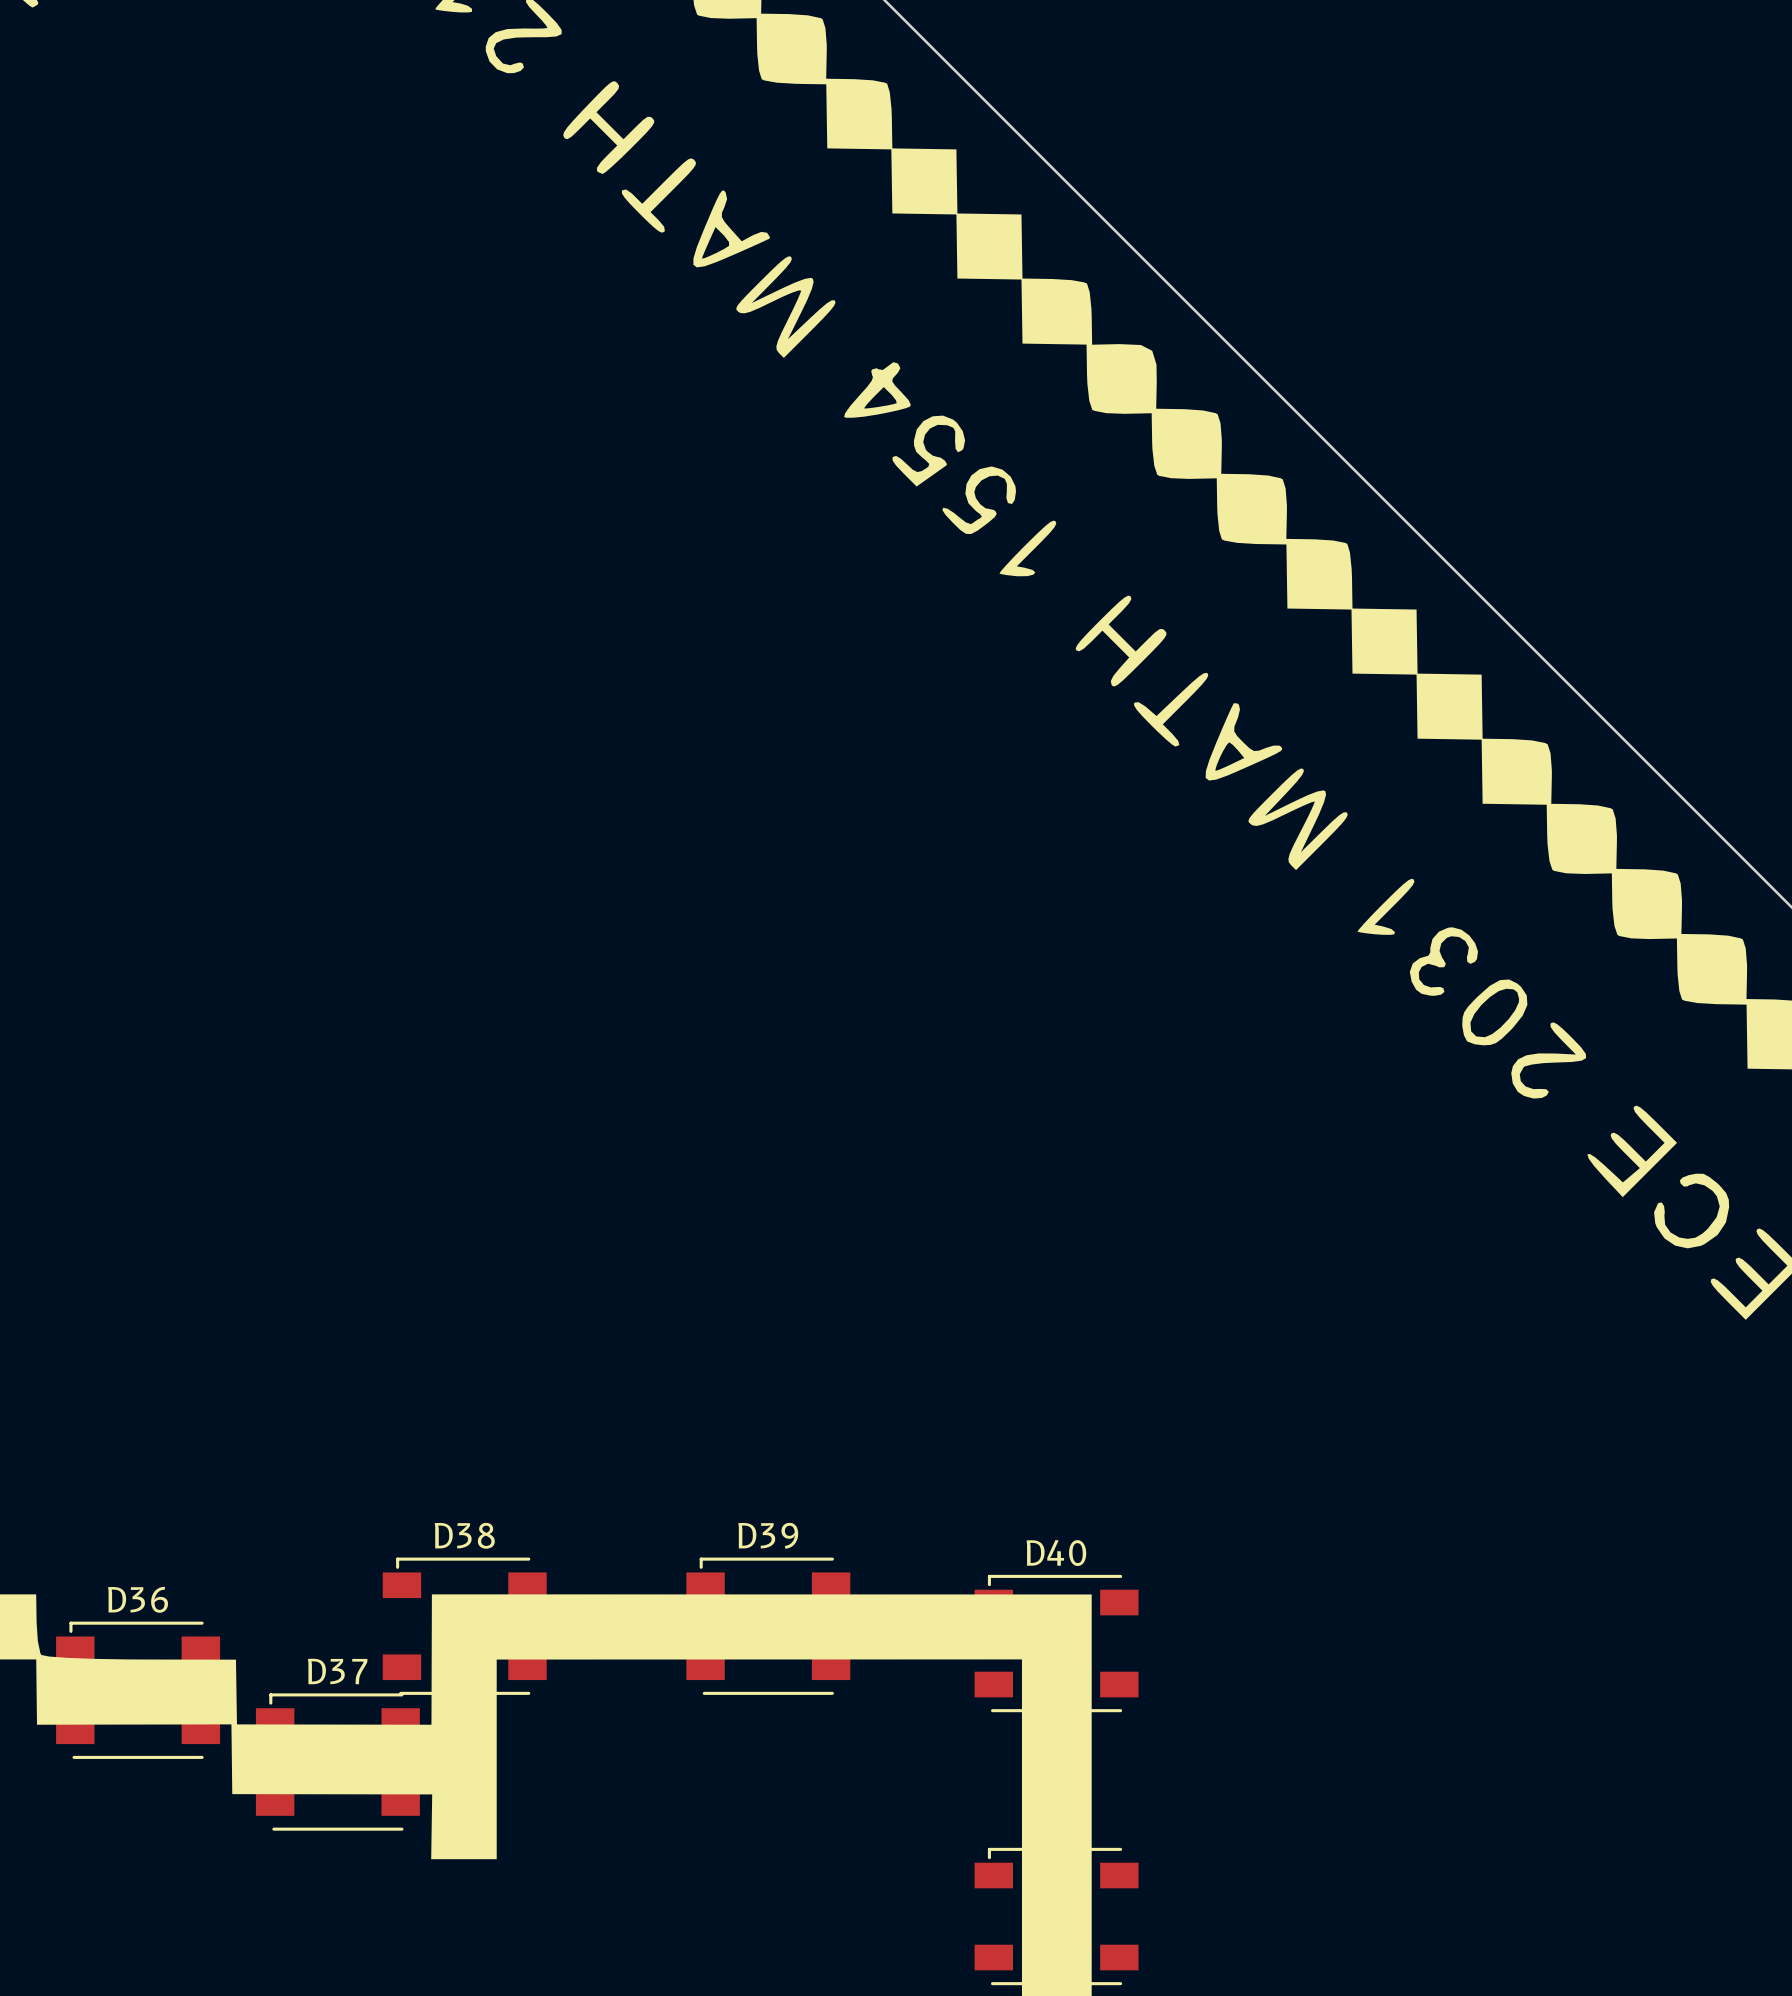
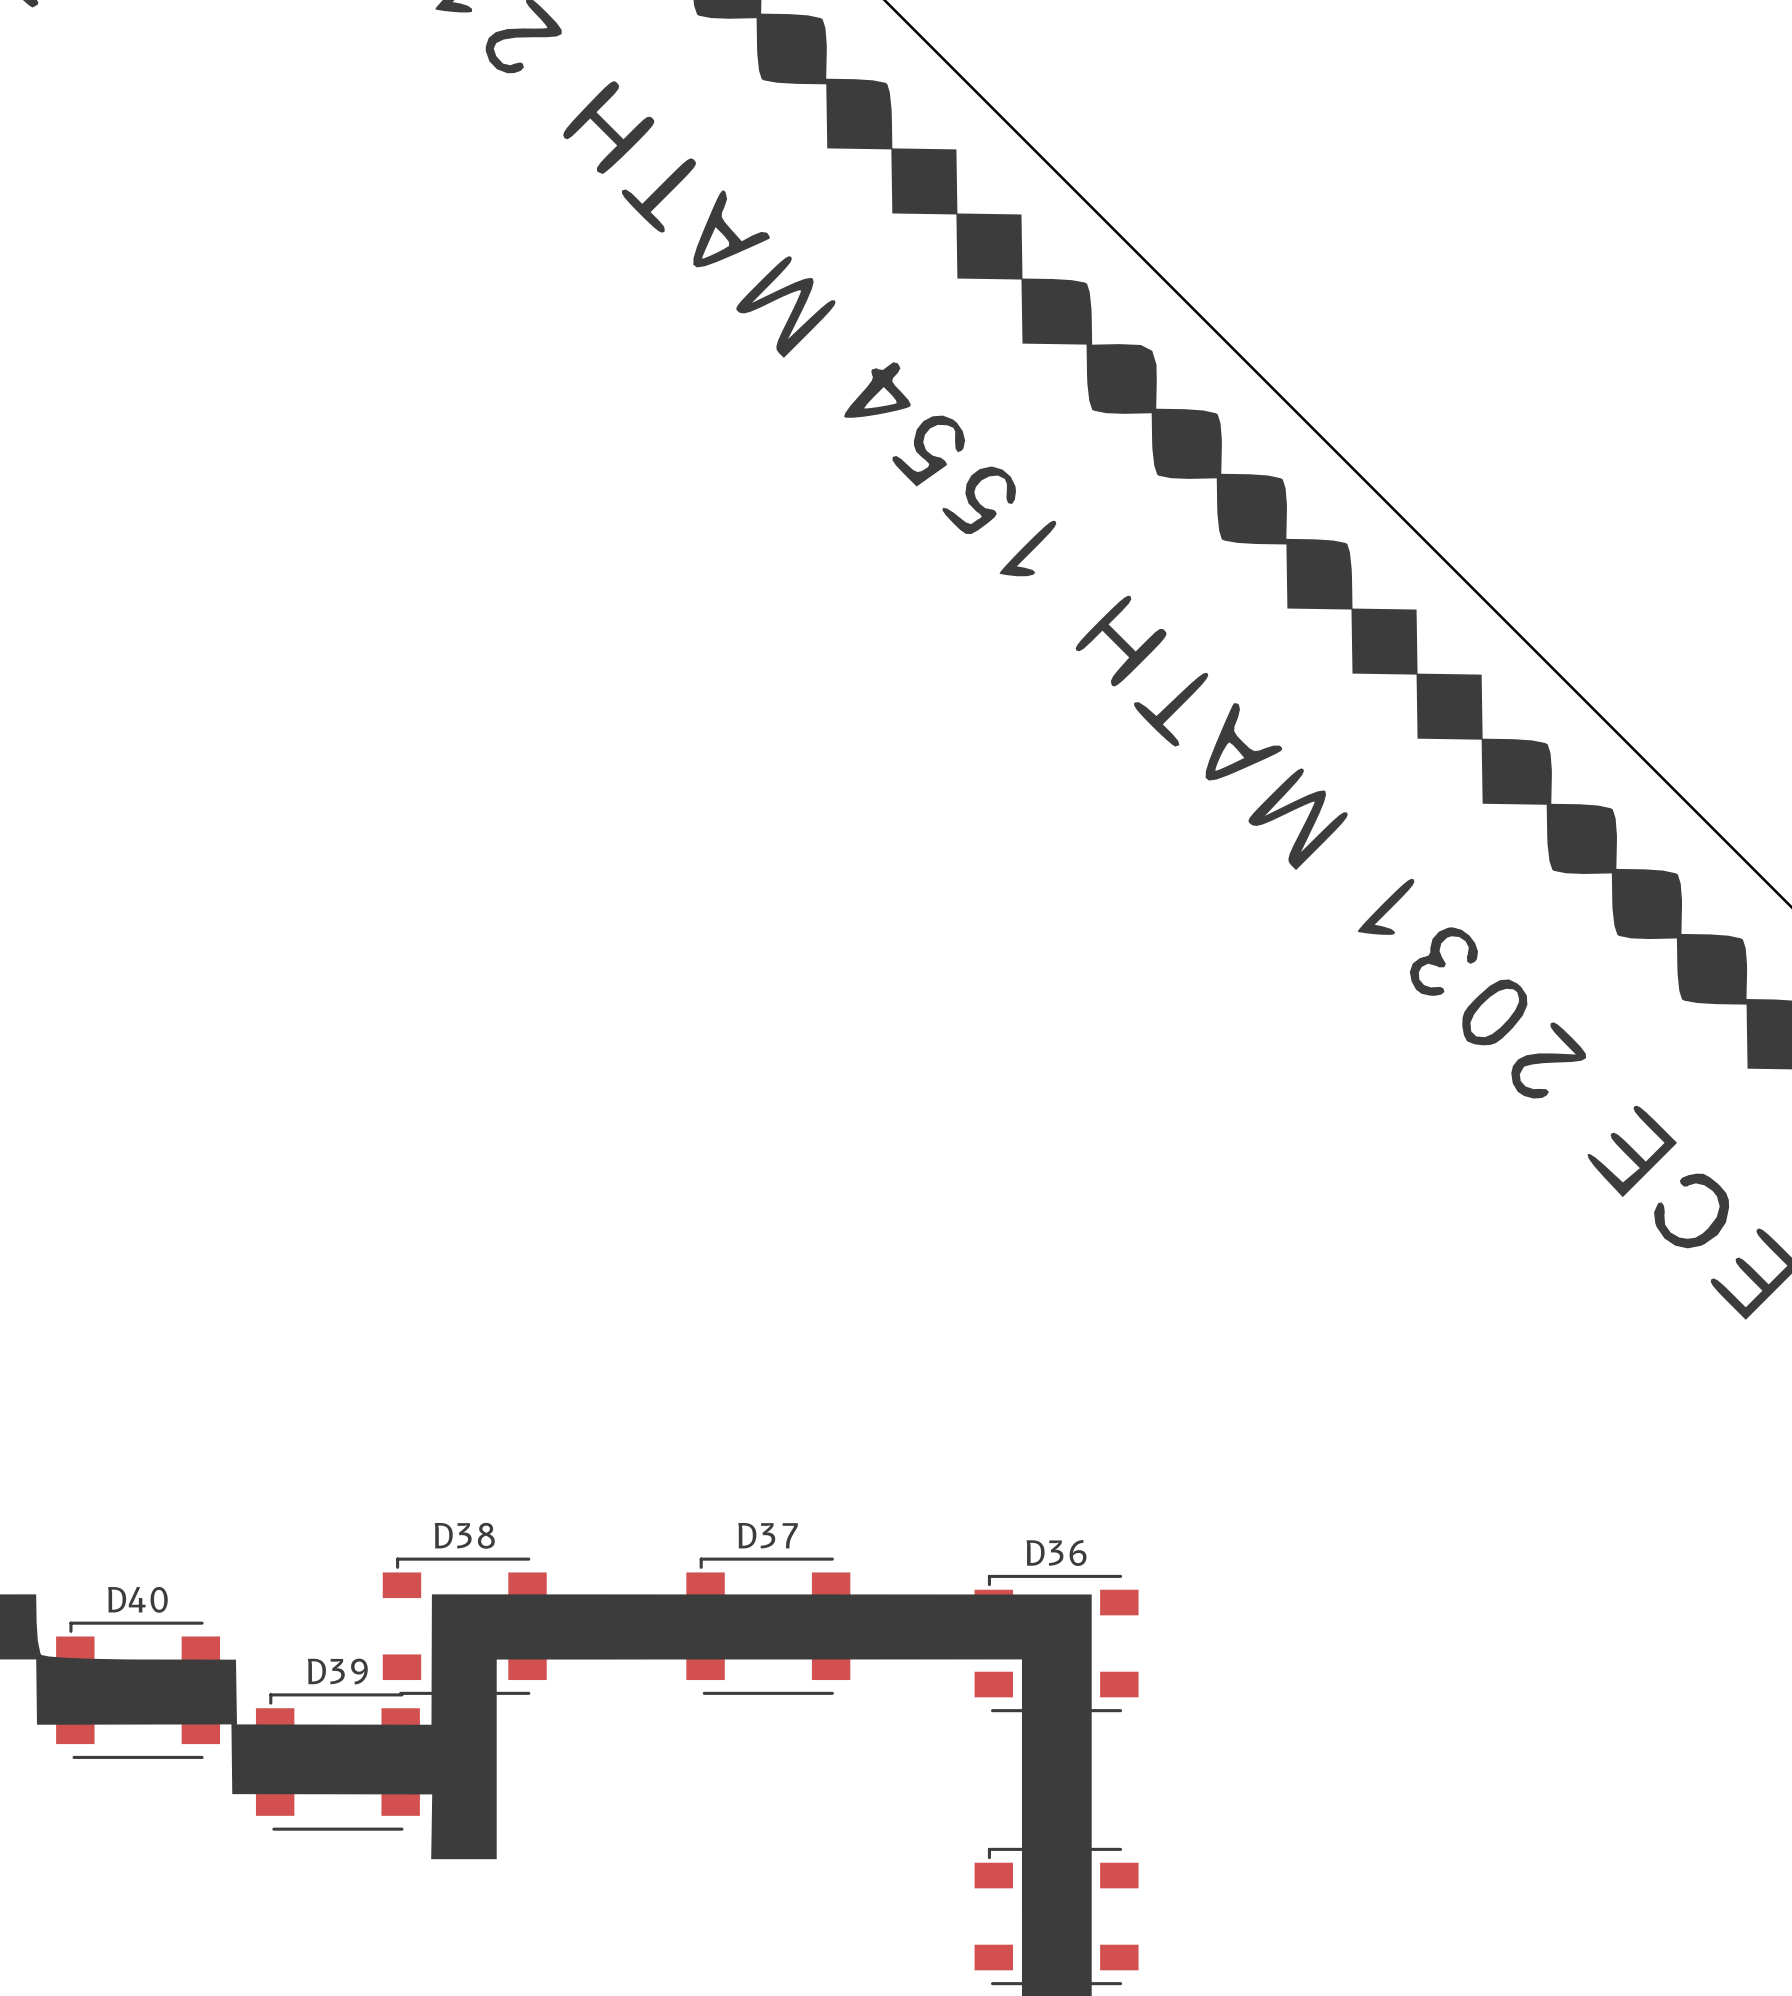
D39 name: D39 (768, 1535) -> D37 (768, 1535)
D40 name: D40 (1056, 1553) -> D36 (1056, 1553)
D36 name: D36 (138, 1599) -> D40 (137, 1599)
D37 name: D37 (337, 1671) -> D39 (337, 1671)

